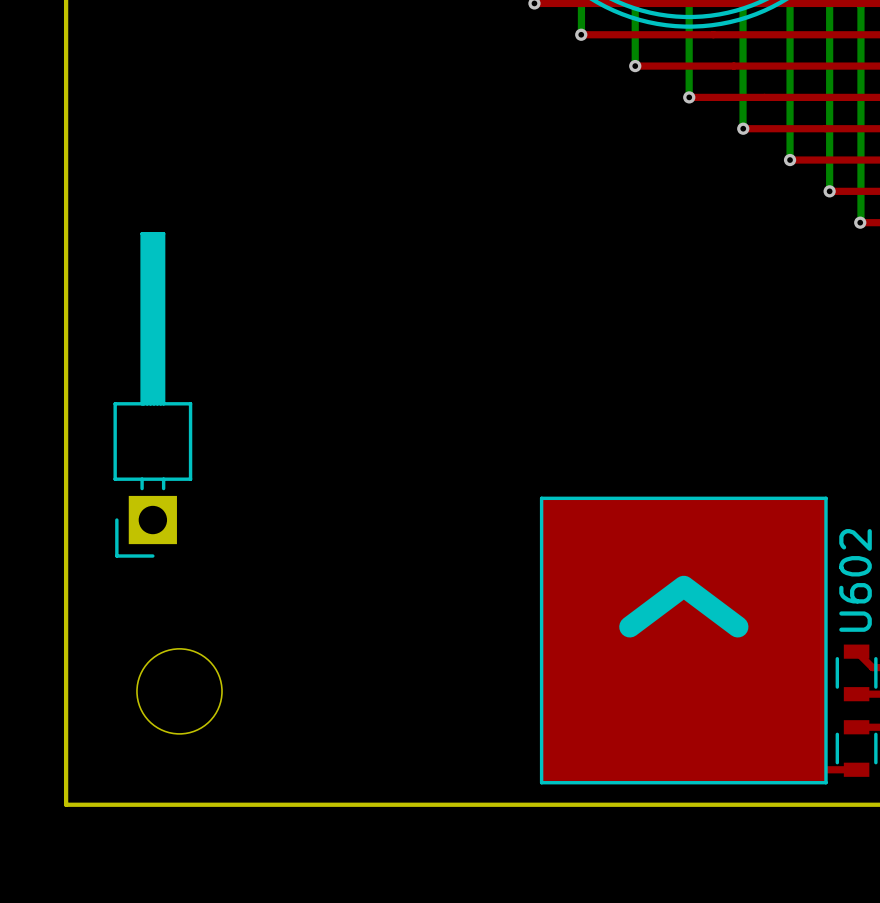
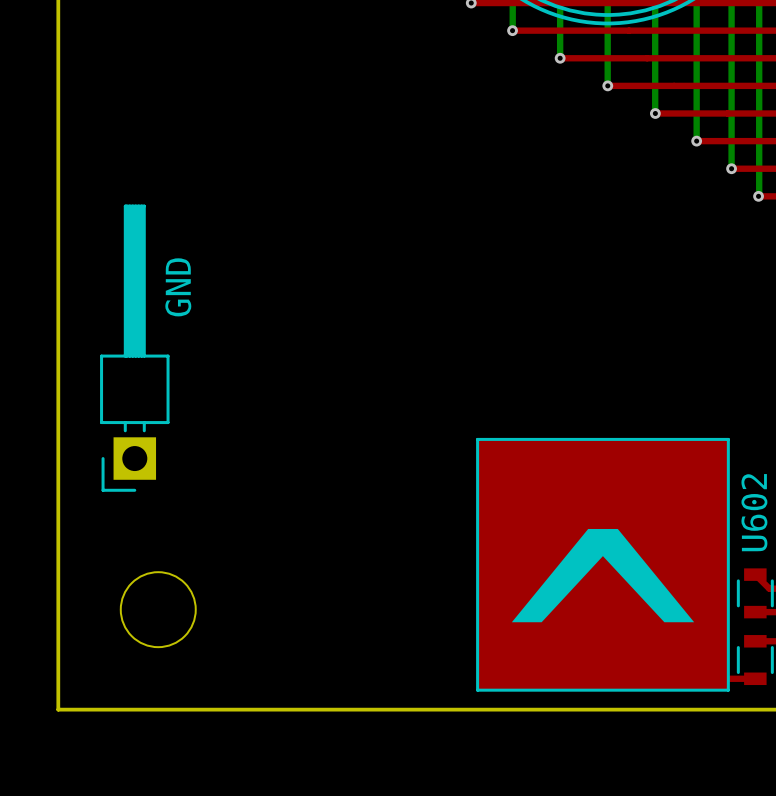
text: none -> GND (178, 287)

